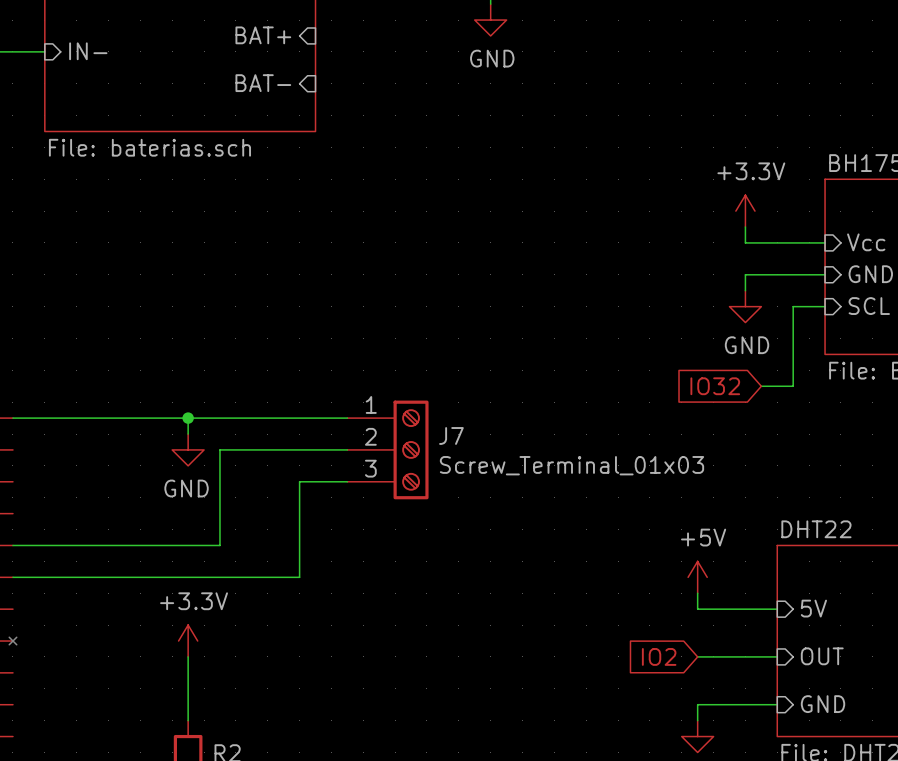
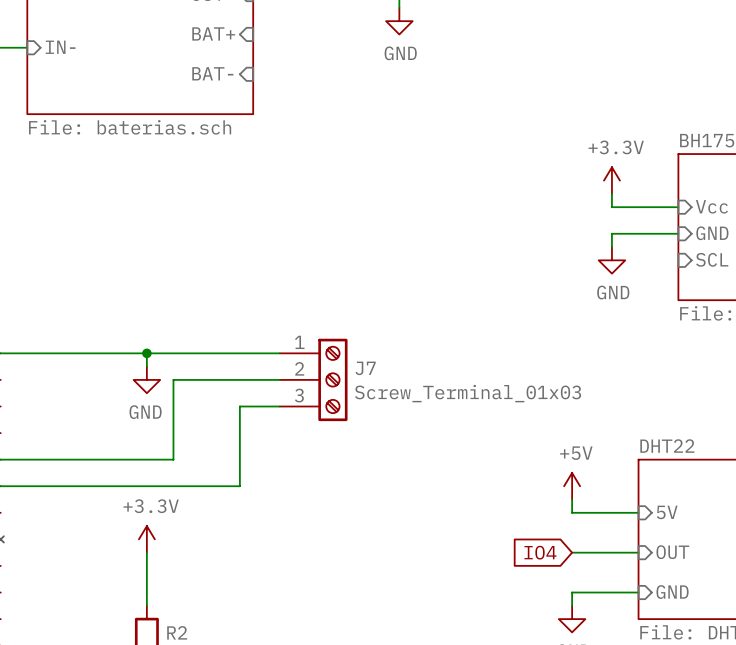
wire: (825, 306) (793, 306) (793, 386) (761, 386) -> none
global label: IO32 (715, 386) -> none
global label: IO2 (659, 656) -> IO4 (540, 552)

